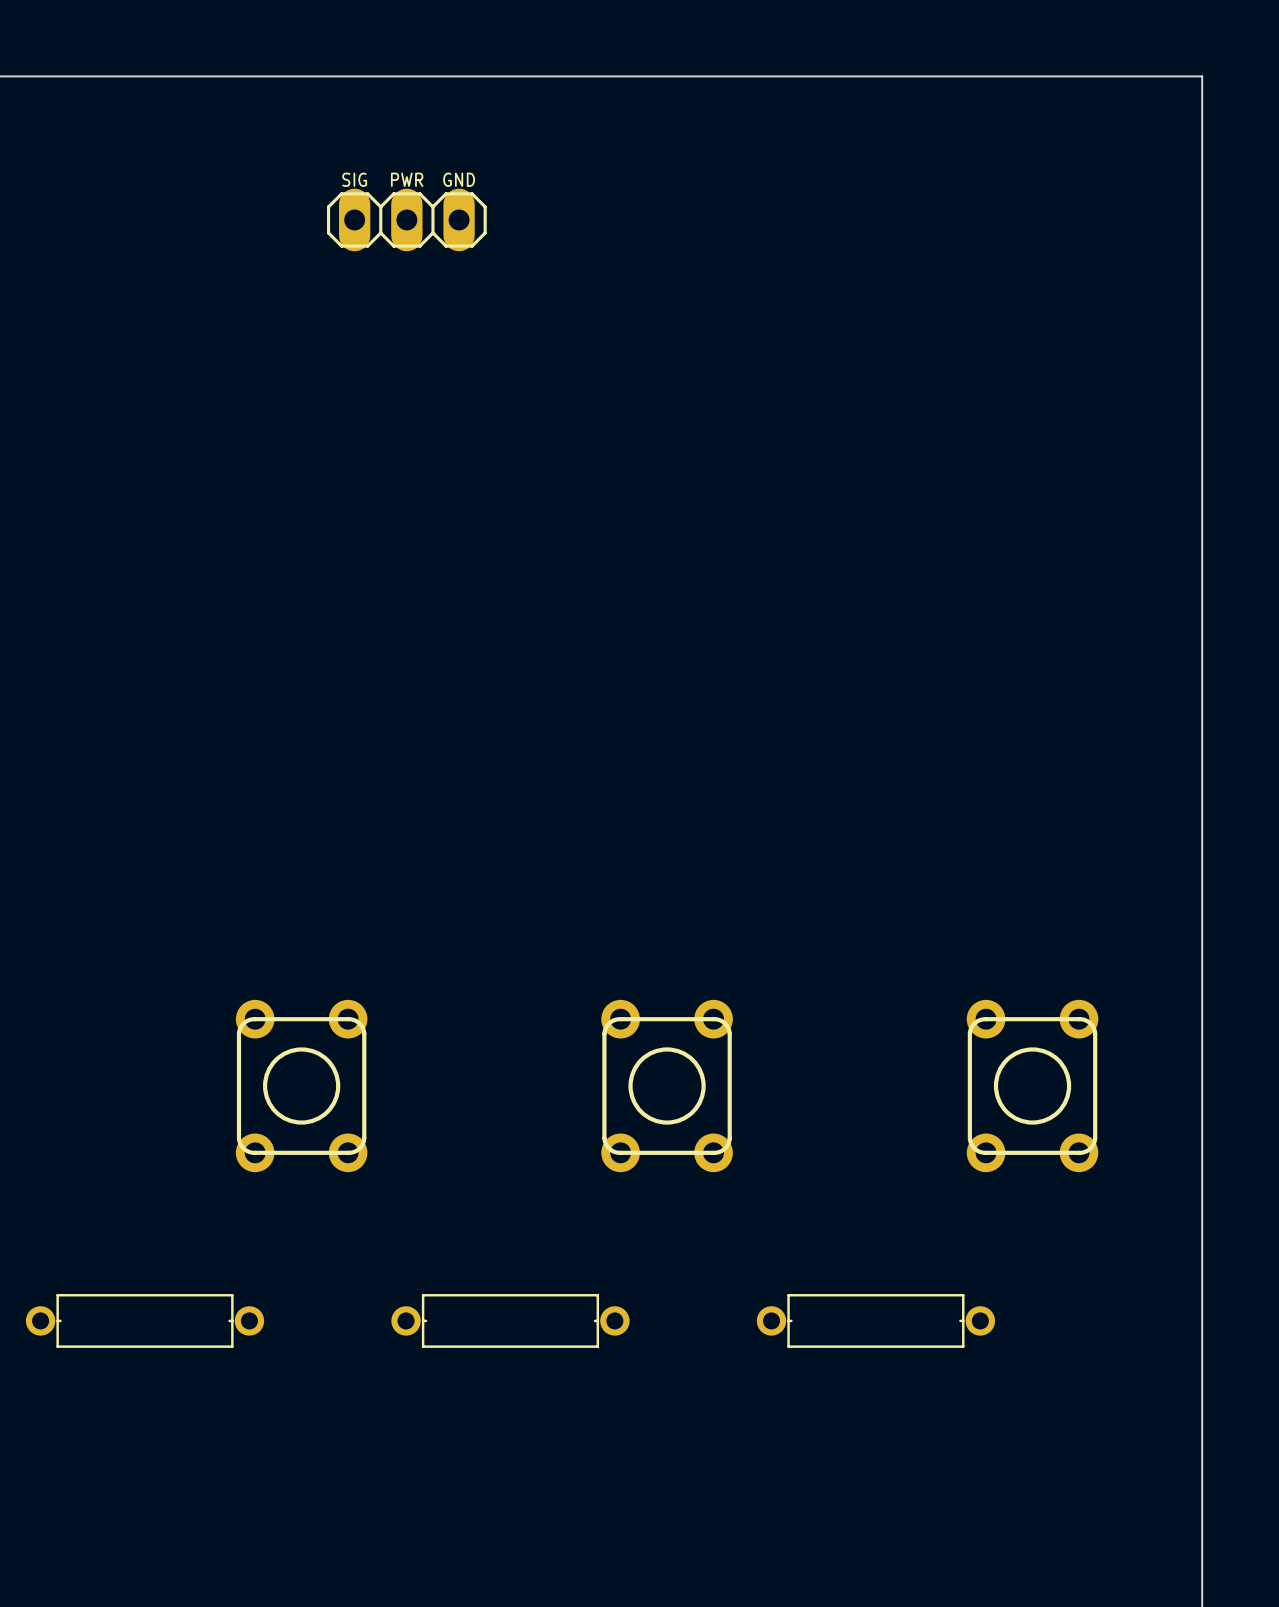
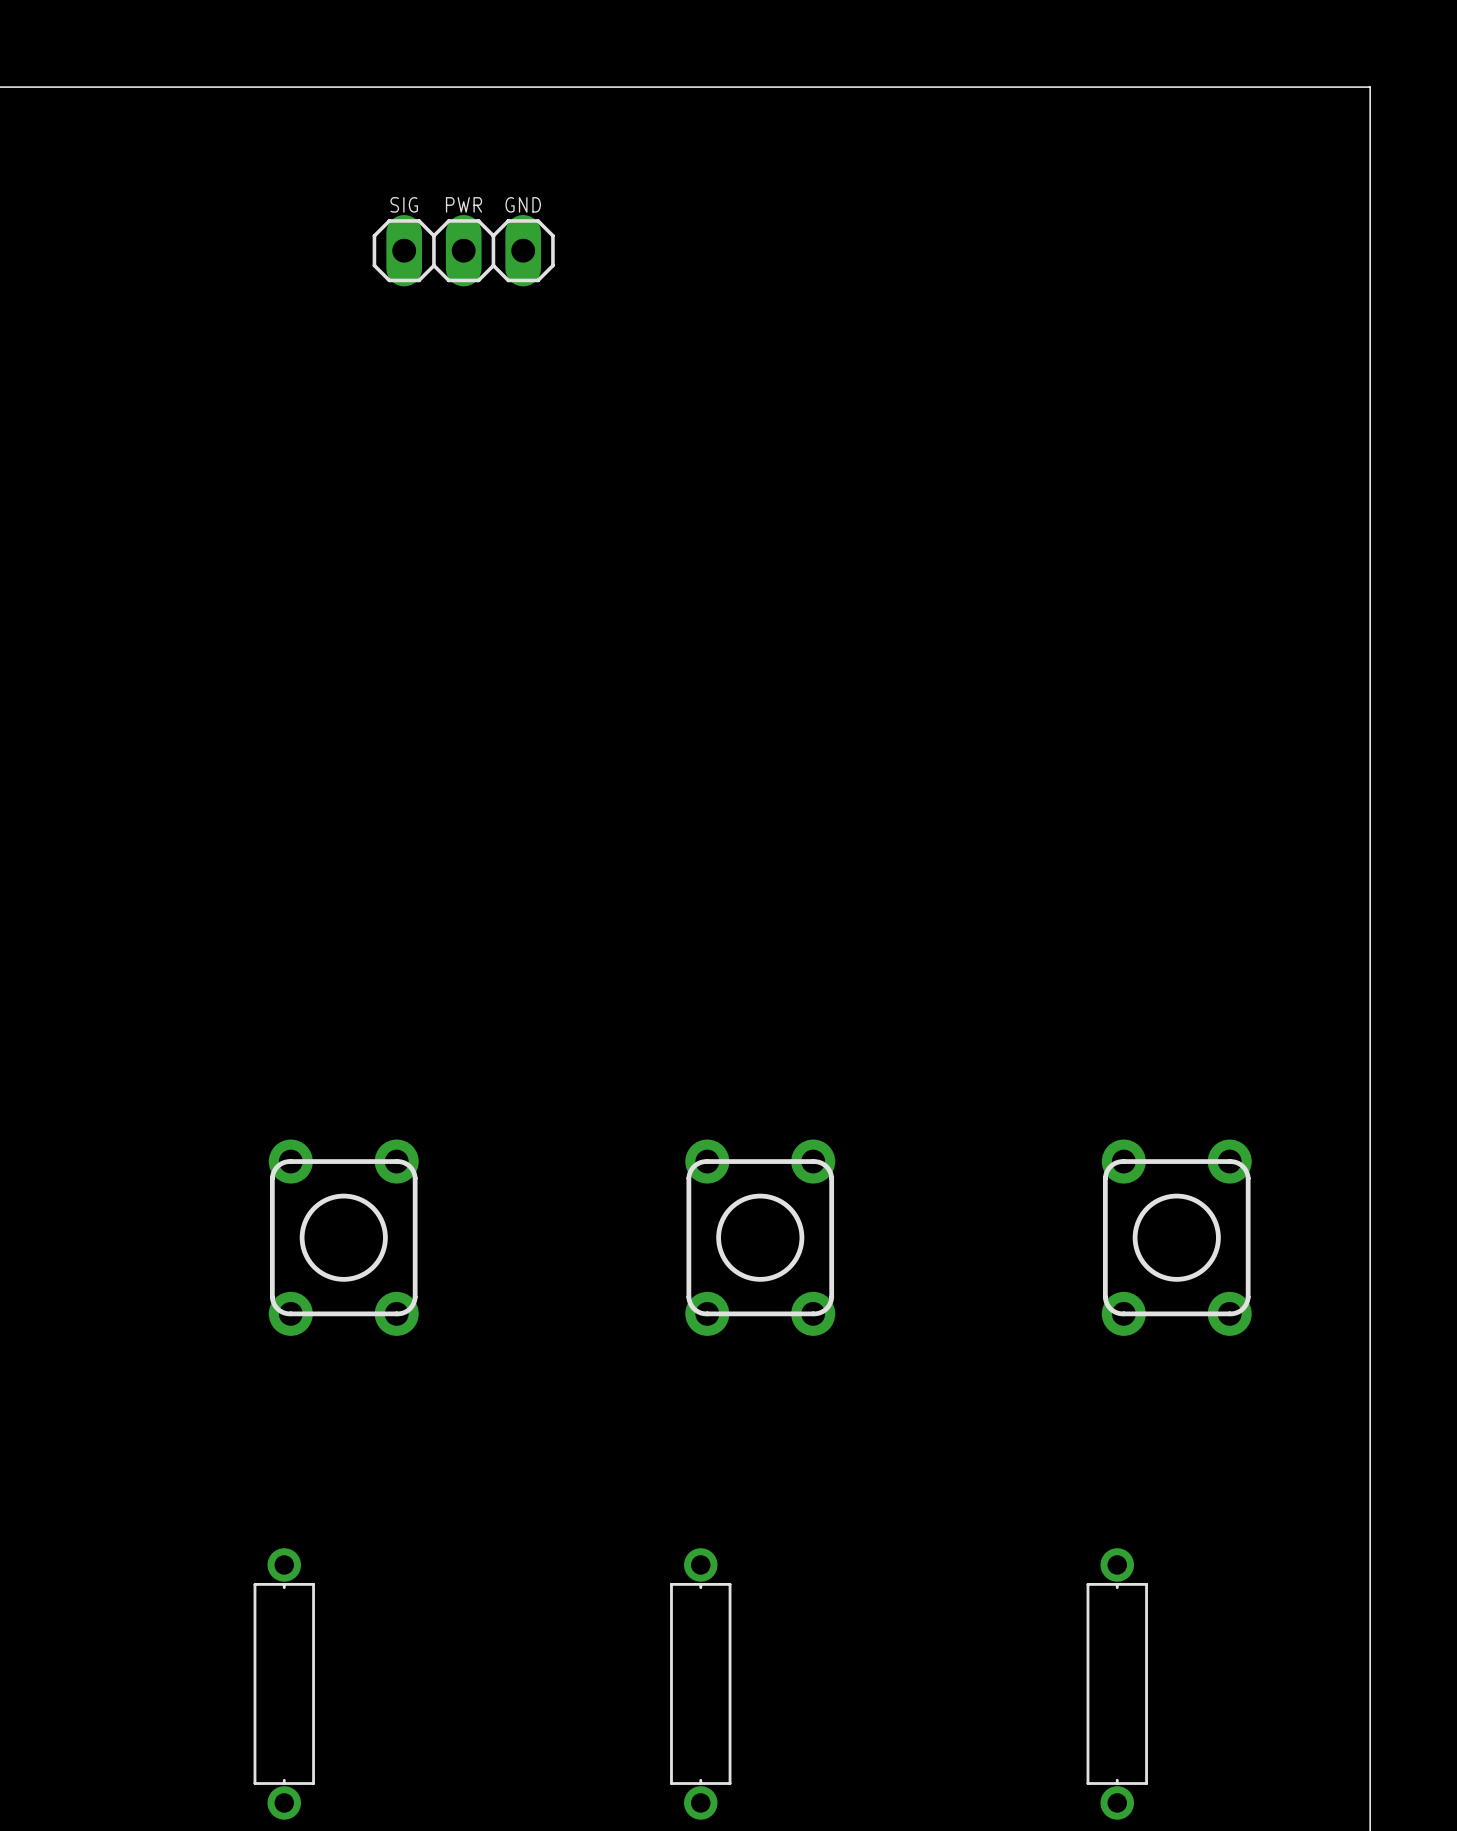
part: (145, 1320) -> none
part: (510, 1320) -> none
part: (875, 1320) -> none
part: none -> (284, 1683)
part: none -> (700, 1683)
part: none -> (1117, 1683)

